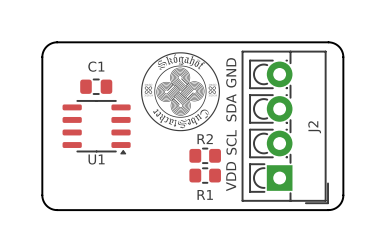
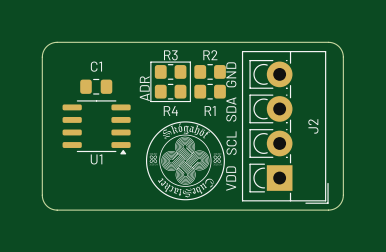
line: none -> (150, 62) (190, 62) (190, 101) (150, 101) (150, 62)
R3: none -> (170, 71)
text: none -> ADR (144, 88)
R4: none -> (170, 91)
drawing position: (180, 91) -> (185, 160)
R2 position: (205, 155) -> (210, 71)
R1 position: (205, 175) -> (210, 91)

